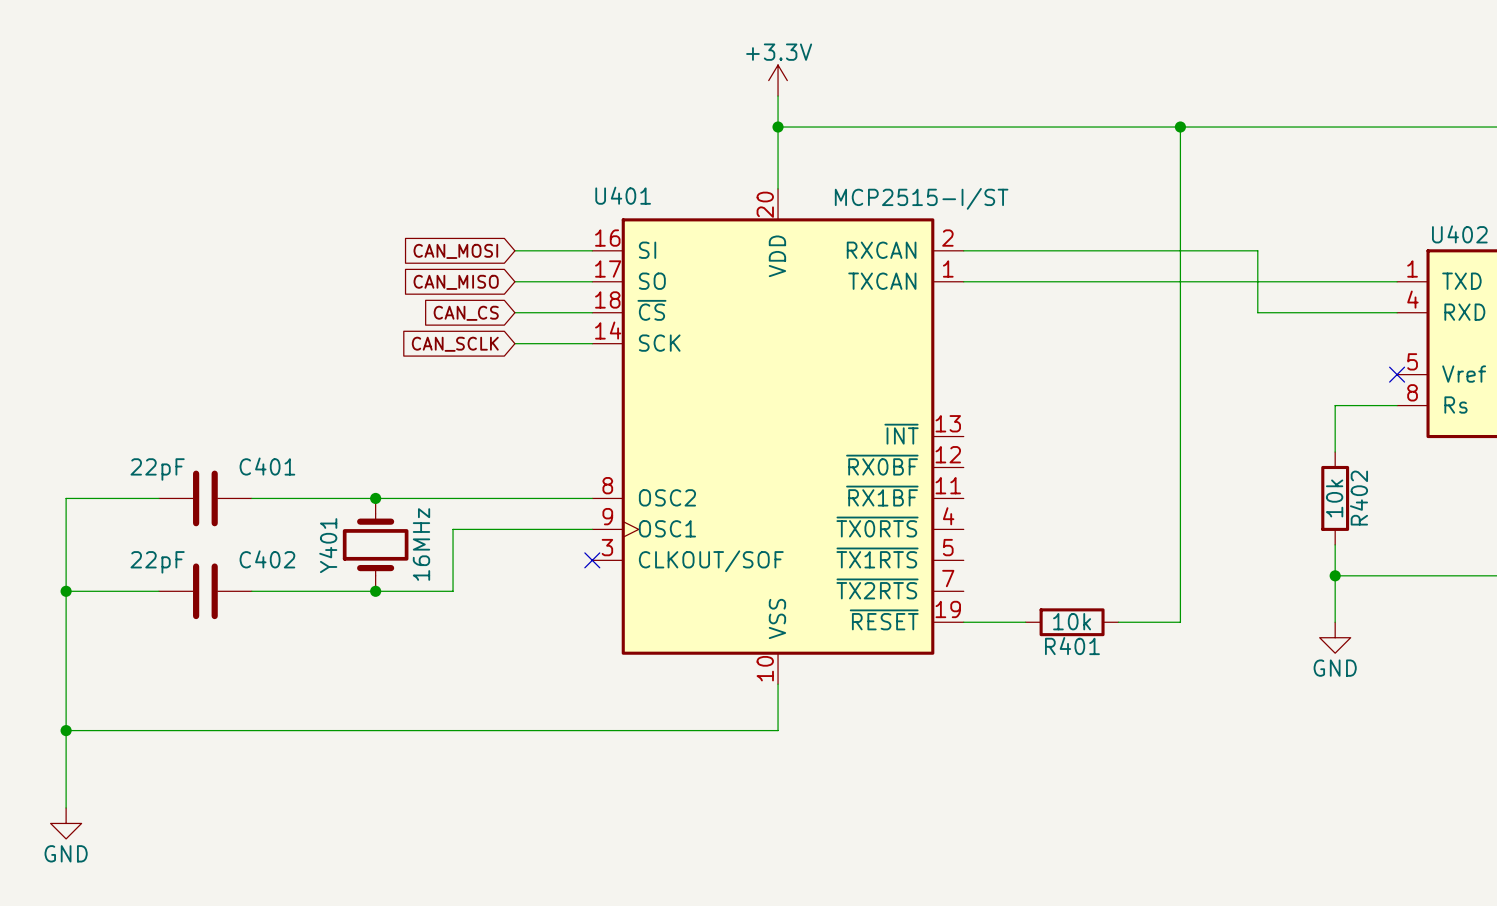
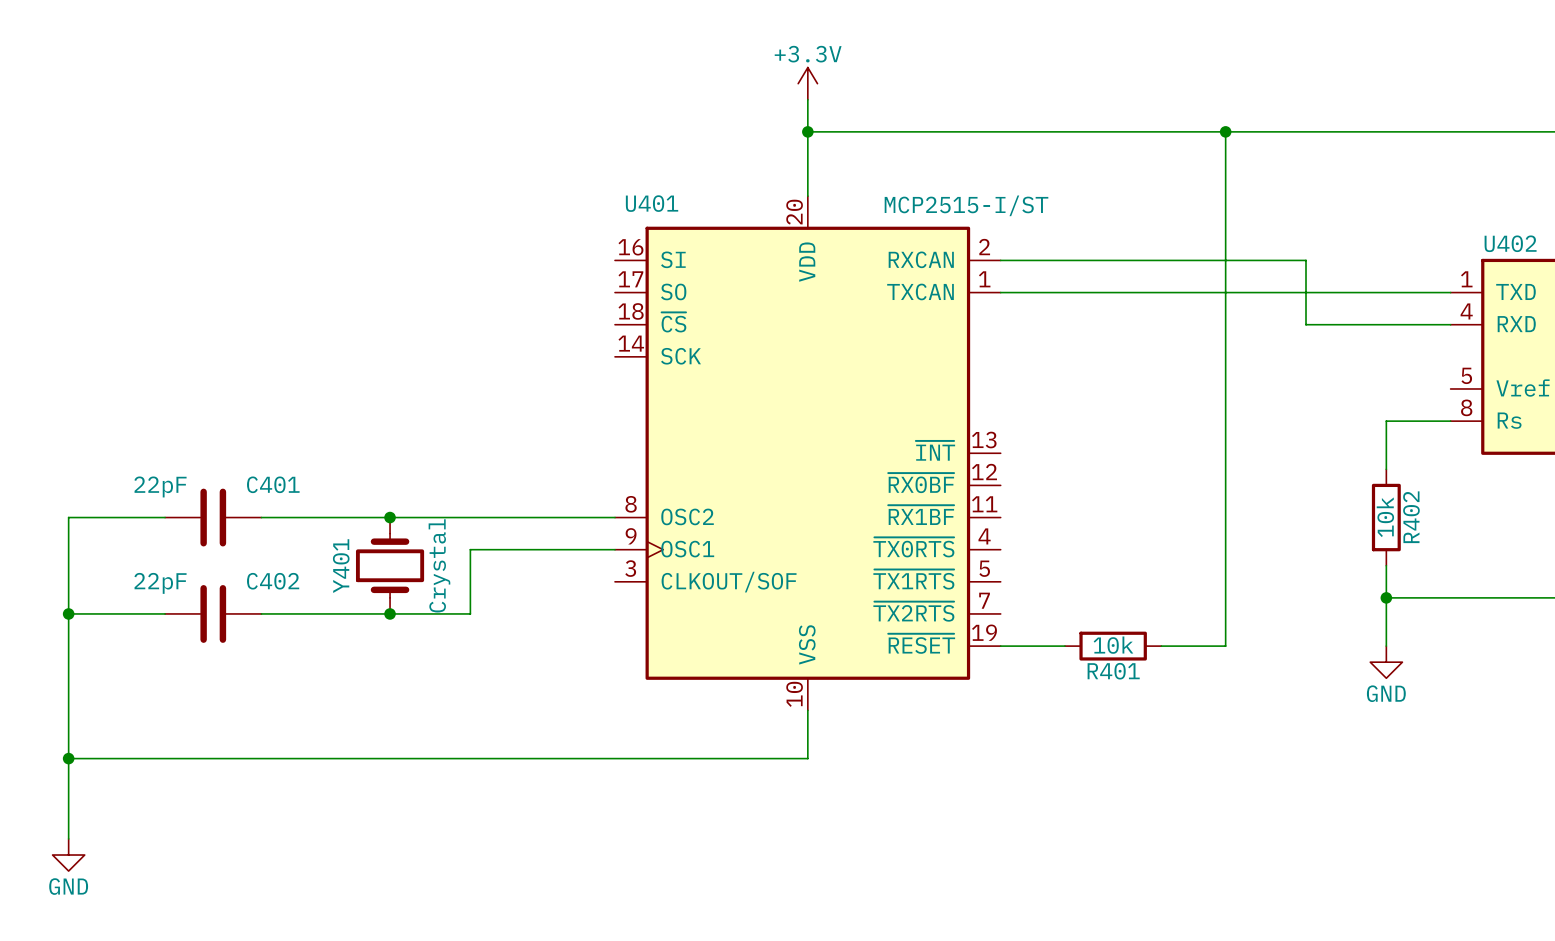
wire: (514, 250) (592, 250) -> none
global label: CAN_MOSI (455, 251) -> none
wire: (514, 281) (592, 281) -> none
global label: CAN_MISO (456, 282) -> none
wire: (514, 312) (592, 312) -> none
global label: CAN_CS (466, 313) -> none
wire: (514, 343) (592, 343) -> none
global label: CAN_SCLK (455, 344) -> none
no-connect mark: (1397, 374) -> none
Y401 value: 16MHz (421, 544) -> Crystal (439, 565)
no-connect mark: (592, 560) -> none

